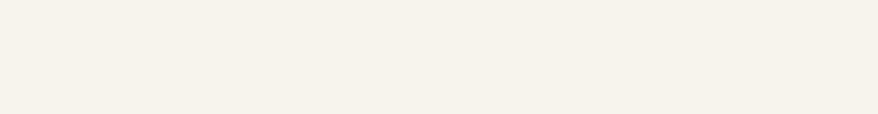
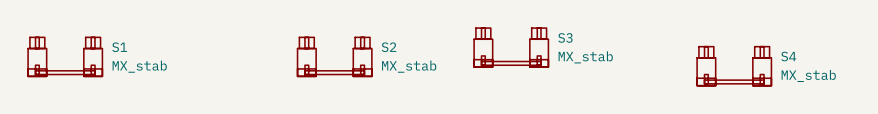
S3: none -> MX_stab (511, 47)
S1: none -> MX_stab (65, 56)
S2: none -> MX_stab (334, 56)
S4: none -> MX_stab (734, 66)

